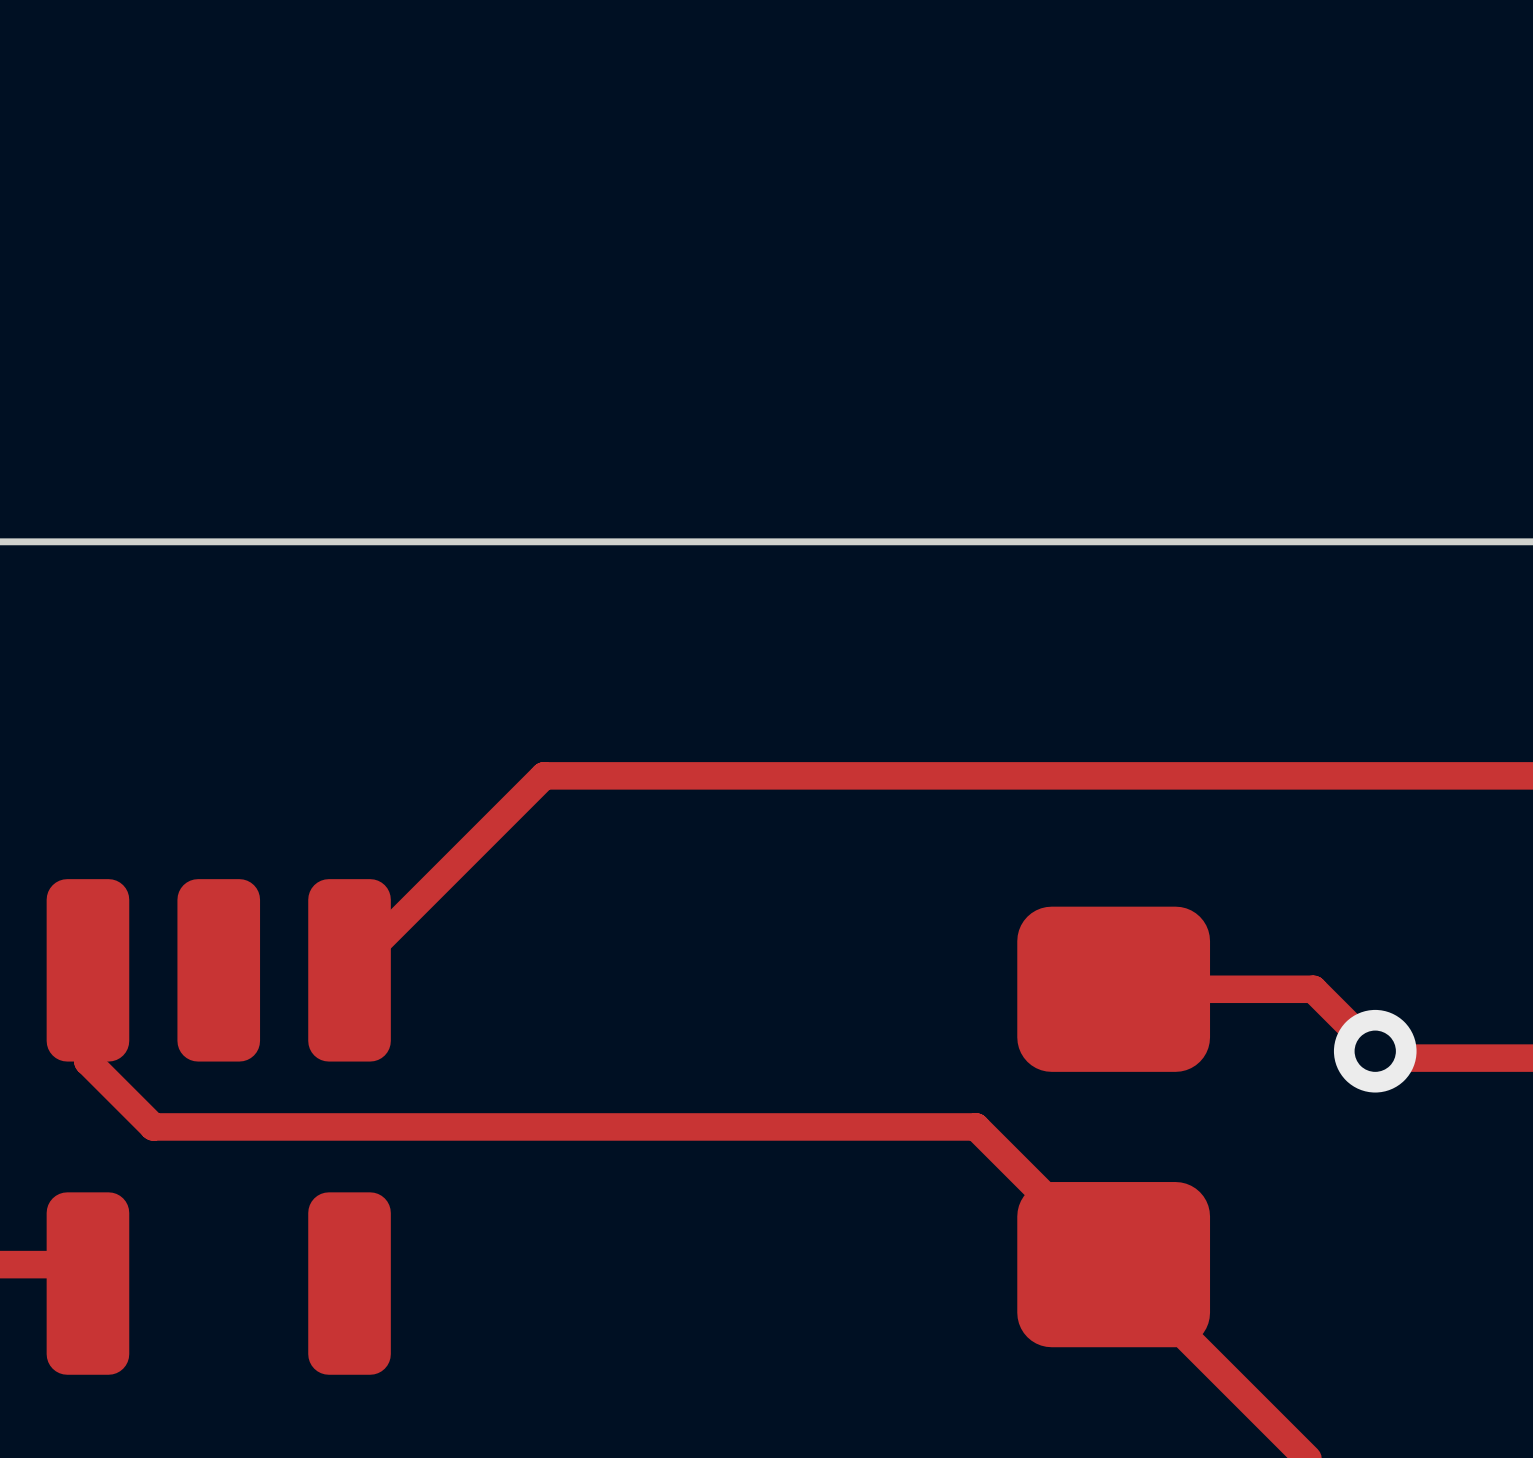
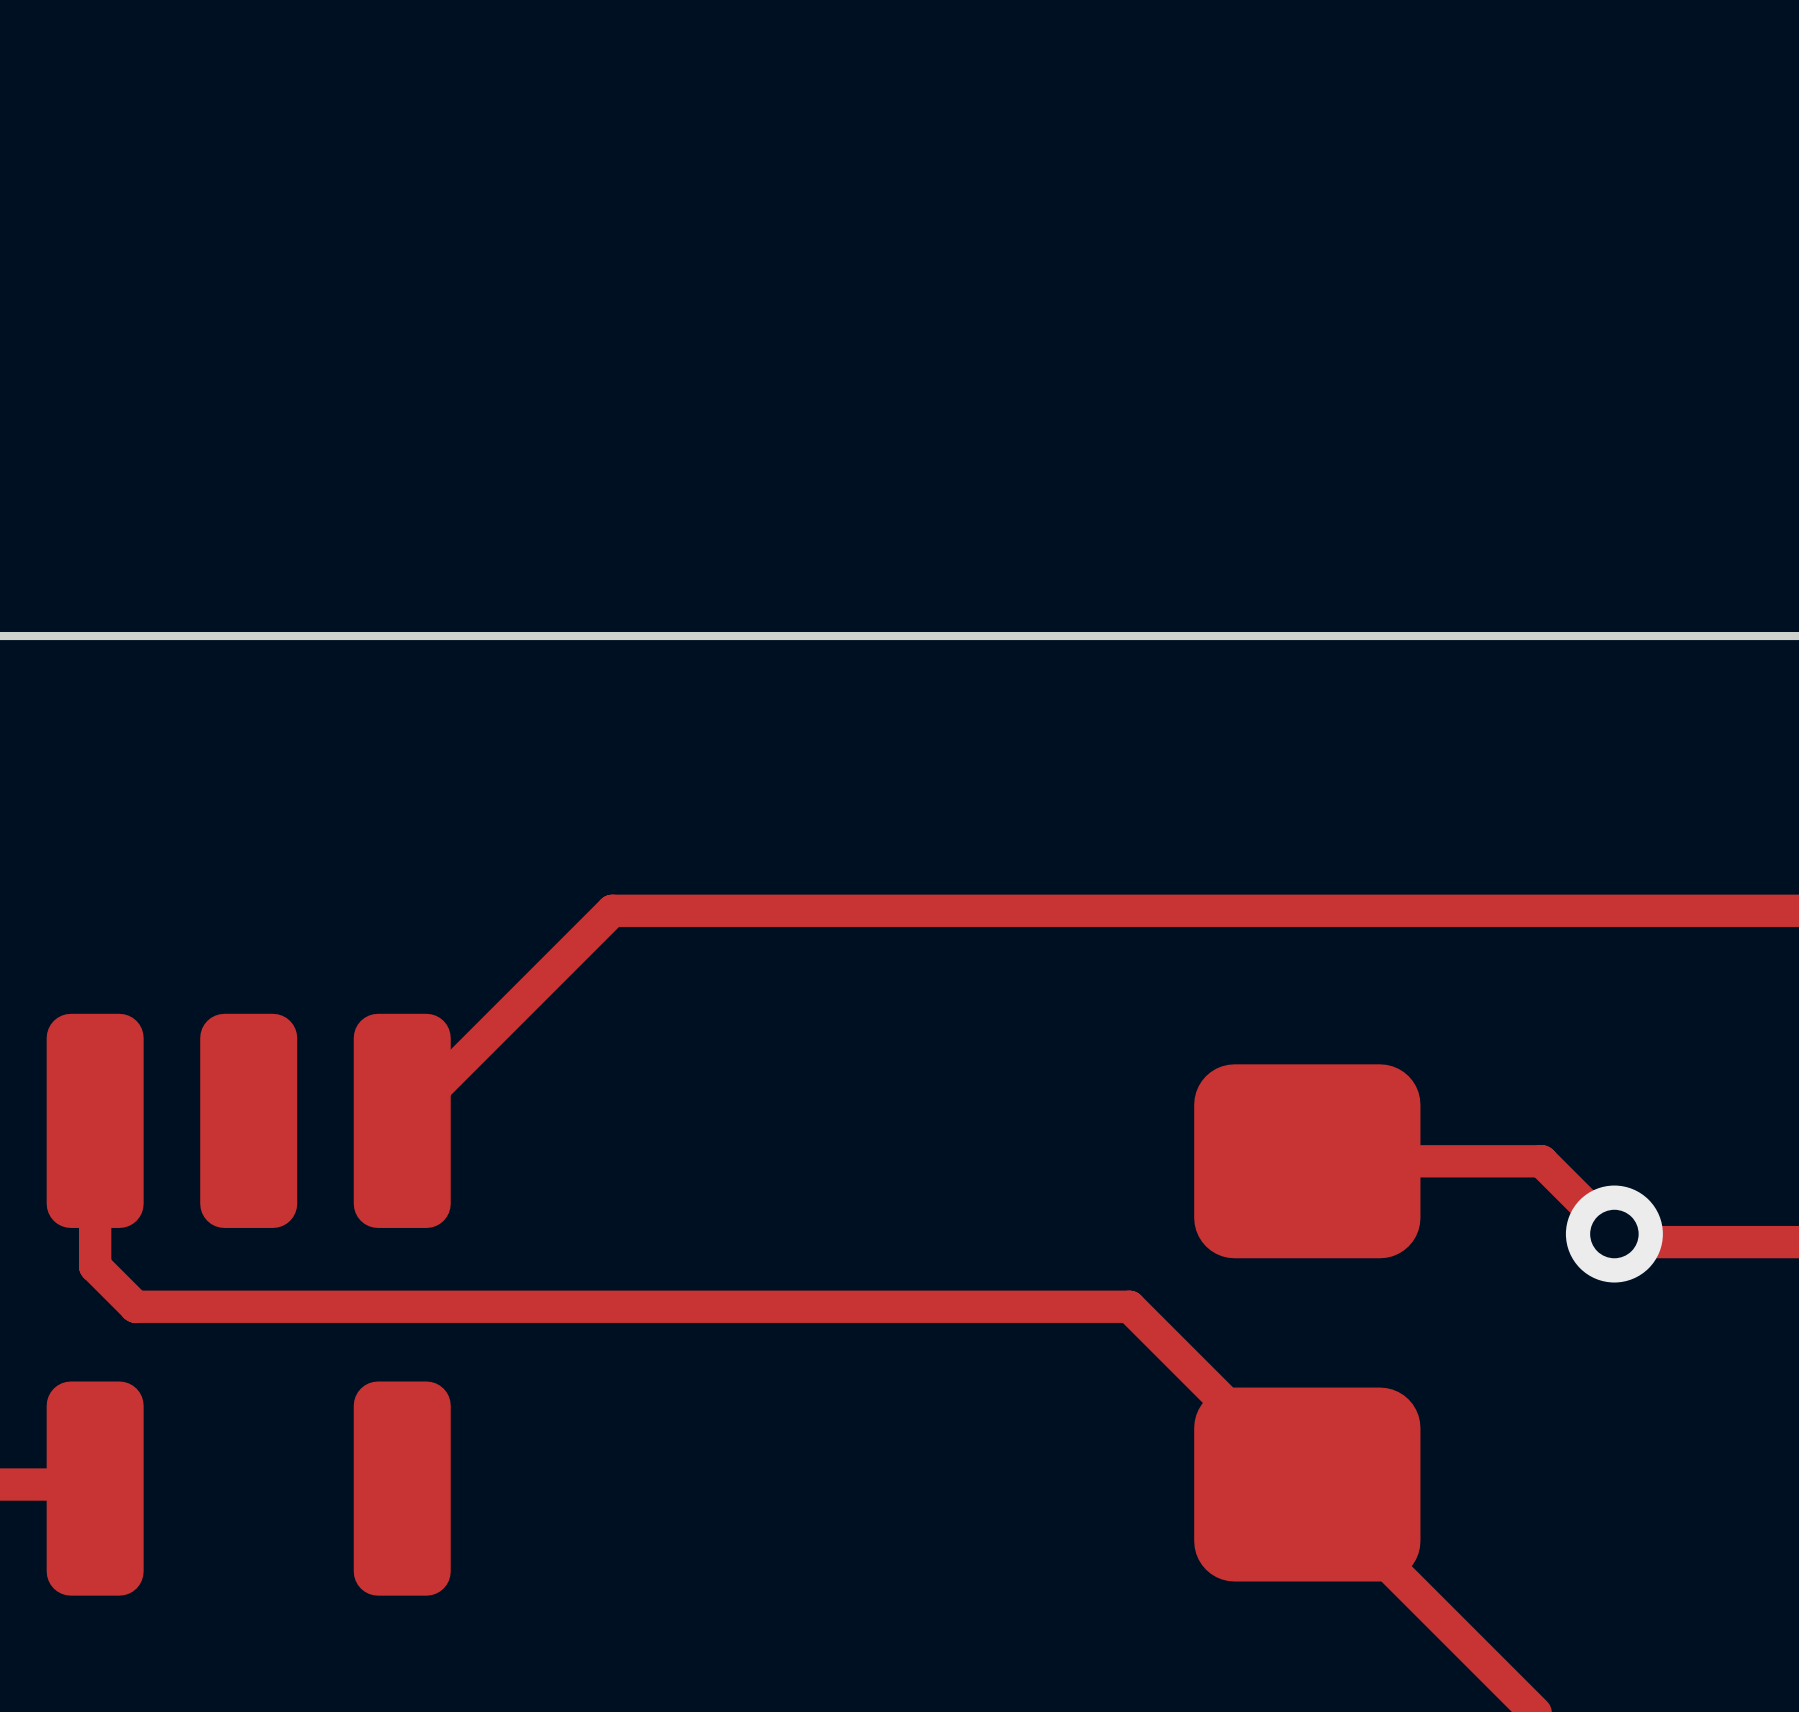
top track: (544, 775) (349, 970) -> (638, 910) (612, 910) (402, 1120) (428, 1120)
top track: (87, 970) (87, 1061) (153, 1126) (975, 1126) -> (103, 1128) (95, 1120) (95, 1266) (135, 1306) (1129, 1306) (1145, 1322)
part position: (218, 1126) -> (248, 1304)

